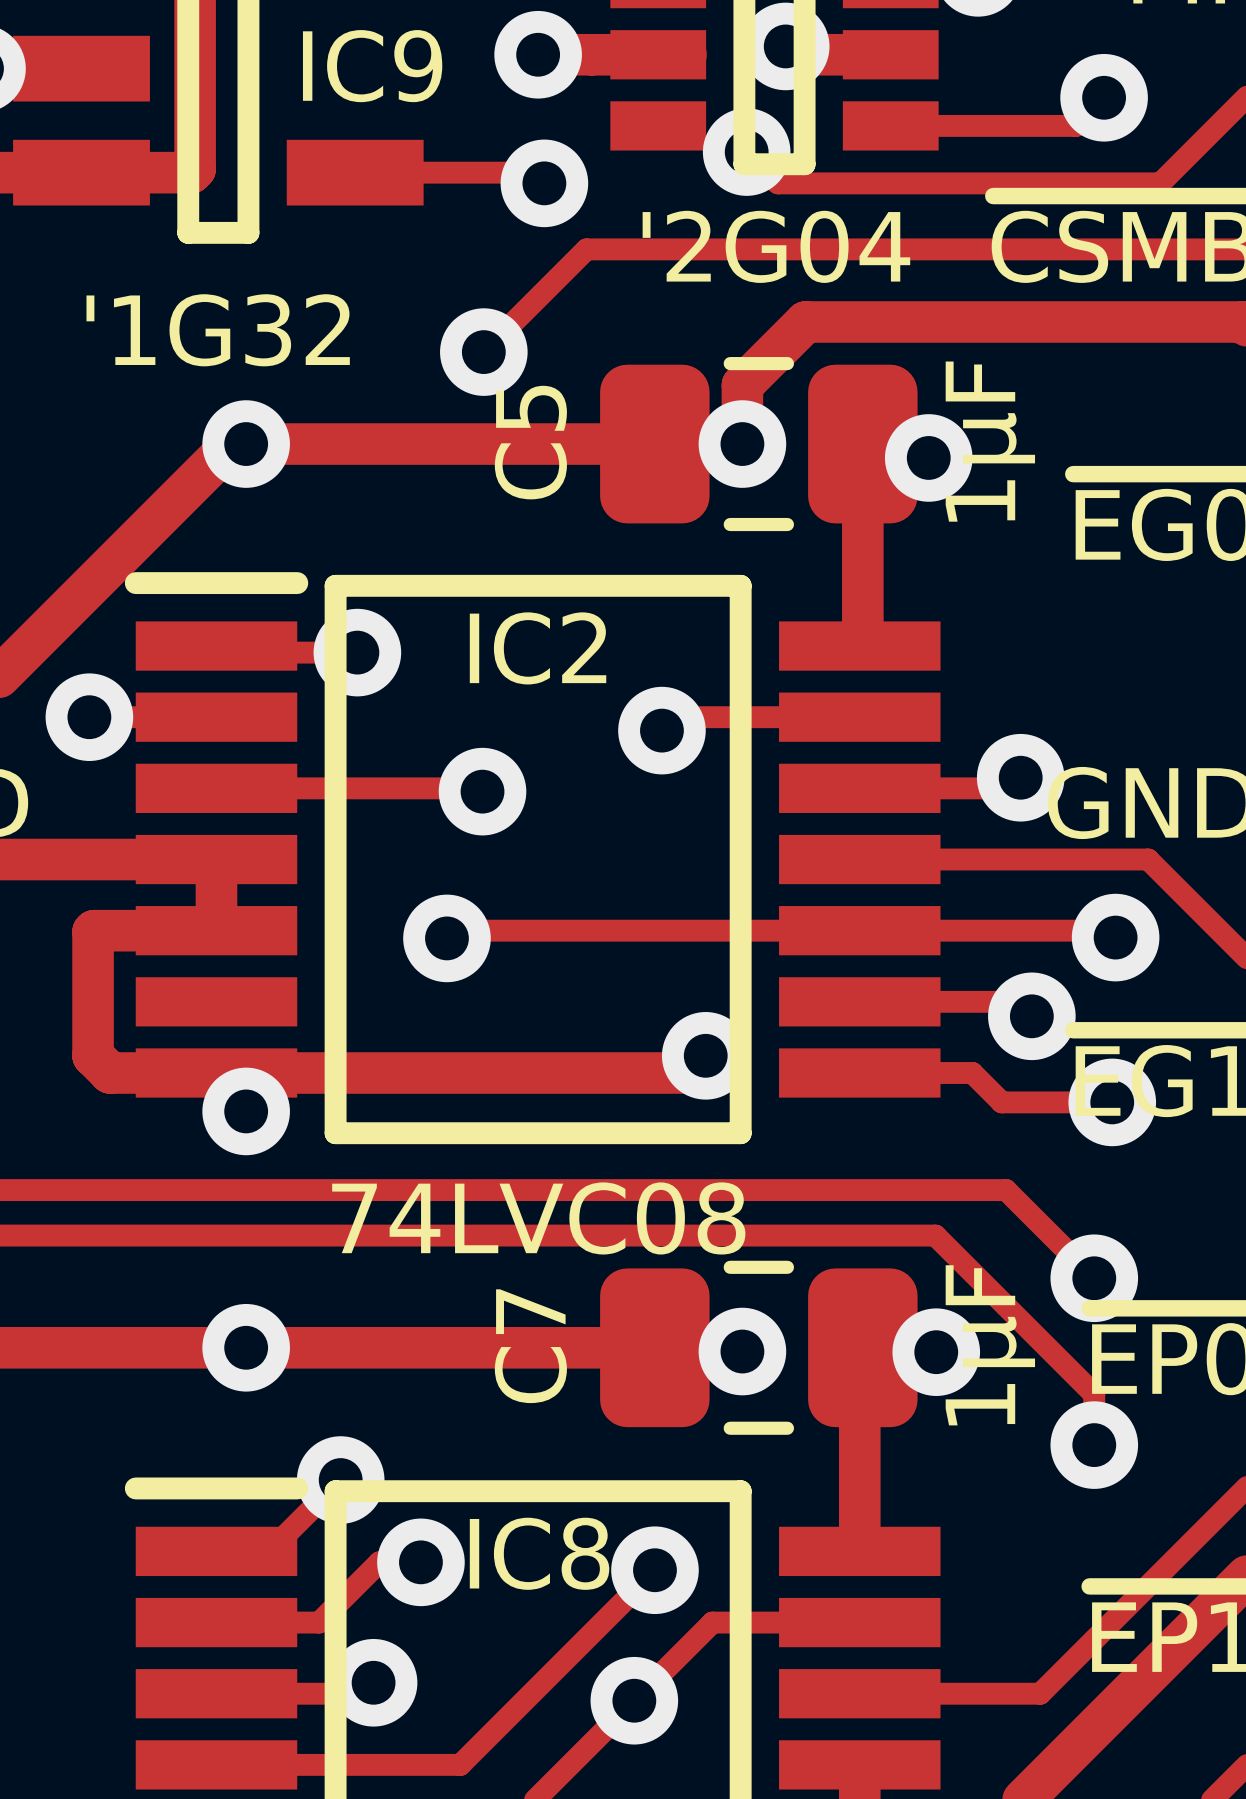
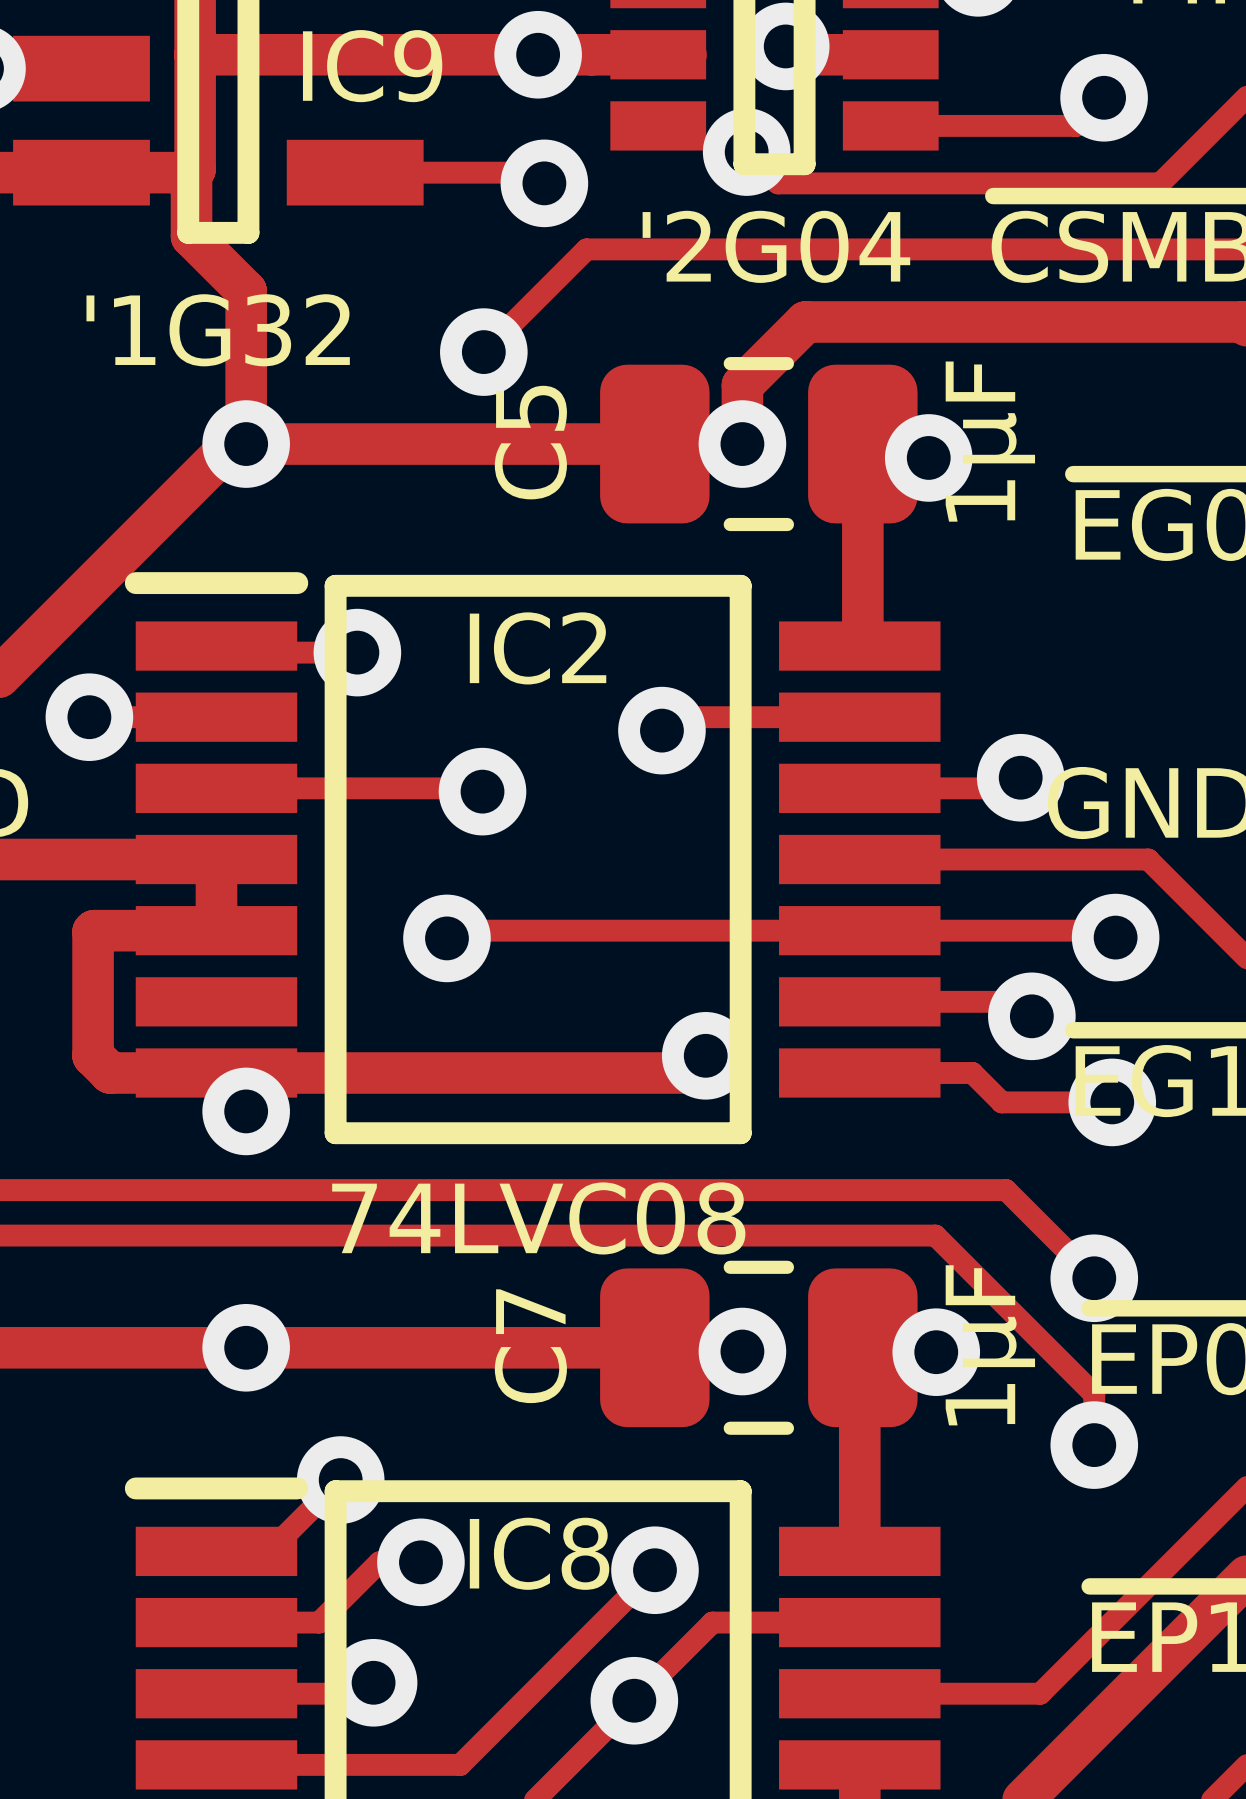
track: none -> (195, 54) (538, 54)
track: none -> (191, 172) (191, 236) (246, 291) (246, 444)

